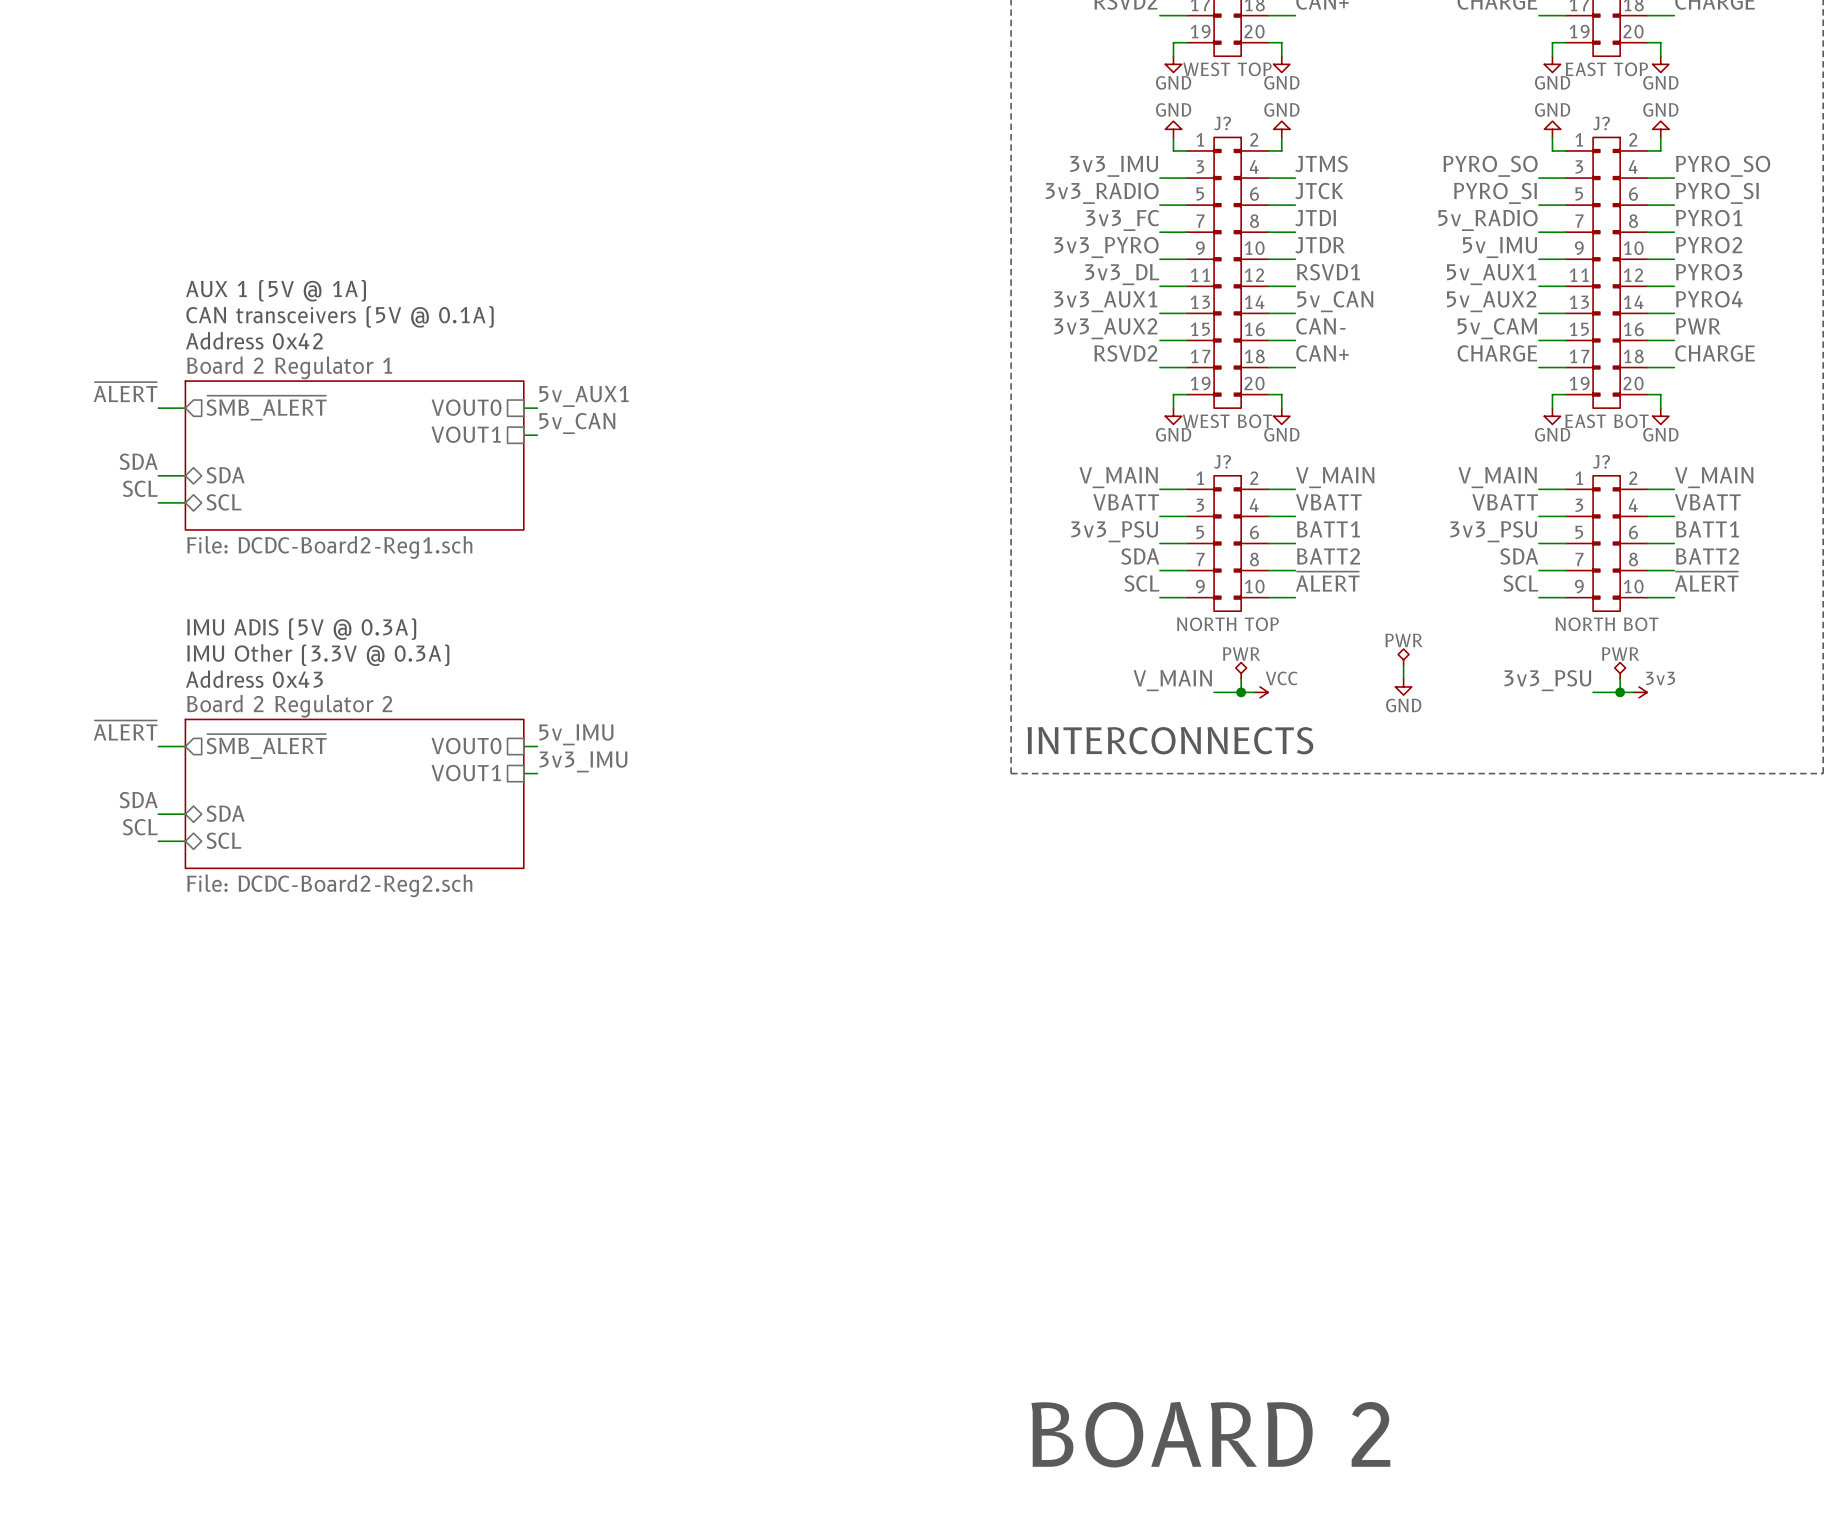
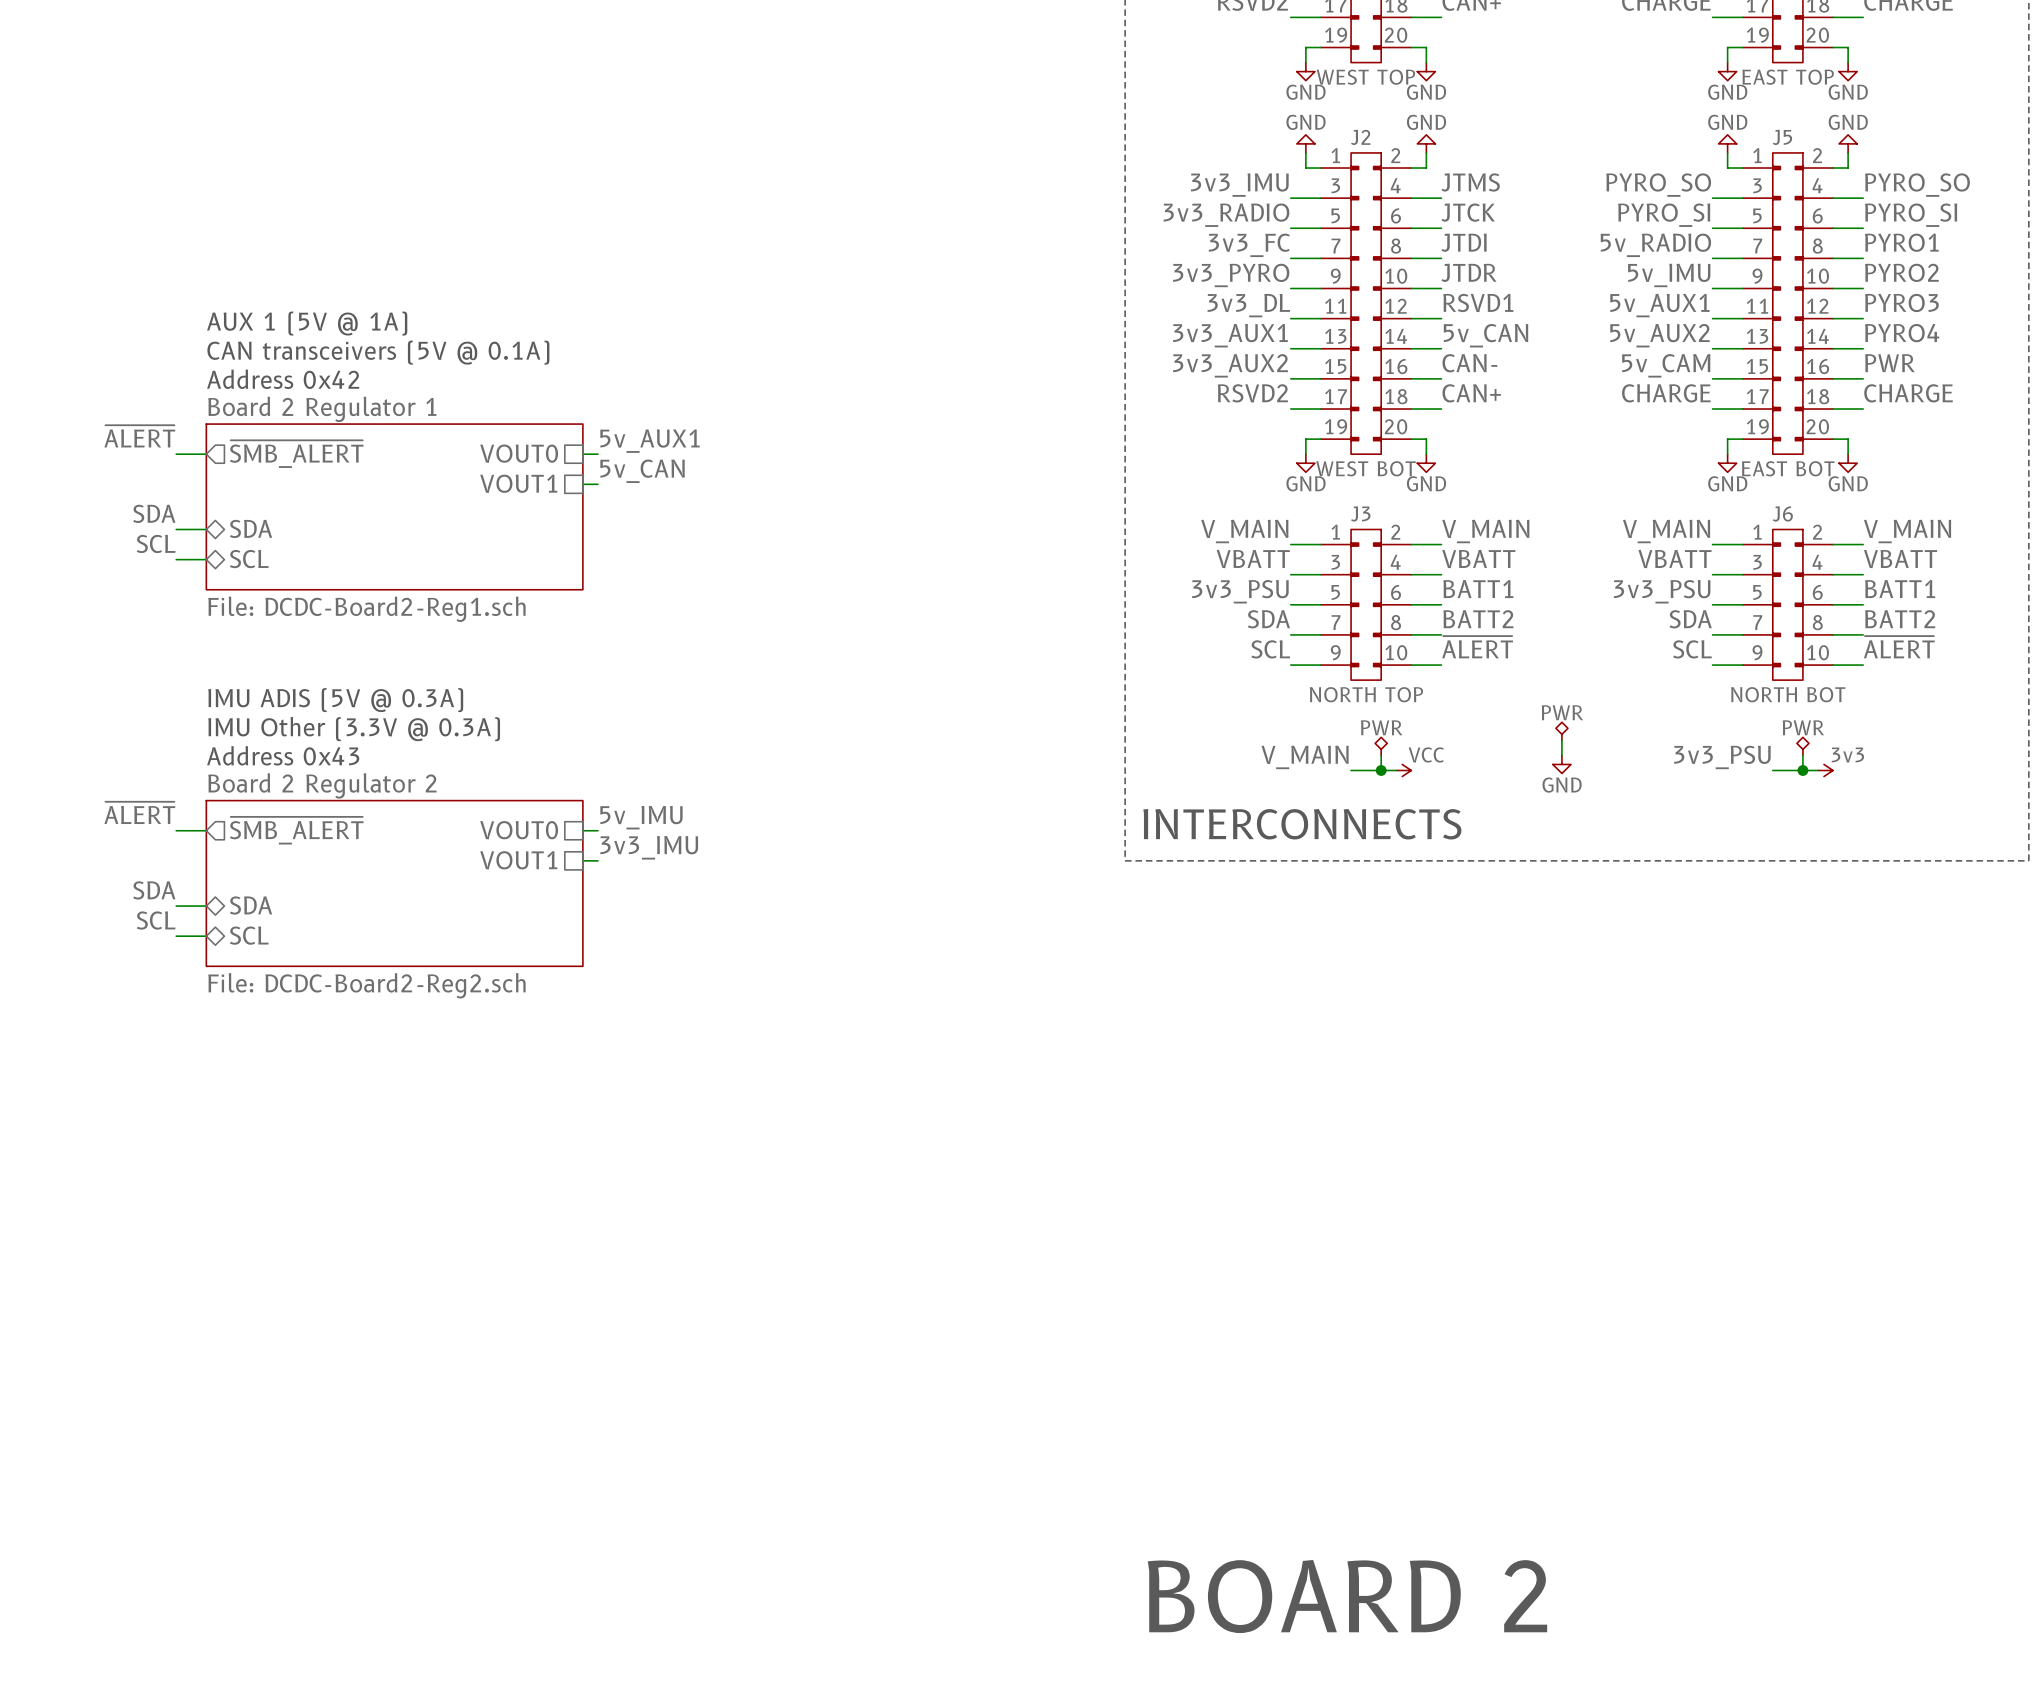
J? name: J? (1222, 123) -> J2 (1360, 137)
J? name: J? (1601, 123) -> J5 (1782, 137)
J? name: J? (1222, 461) -> J3 (1360, 513)
J? name: J? (1601, 461) -> J6 (1782, 513)

